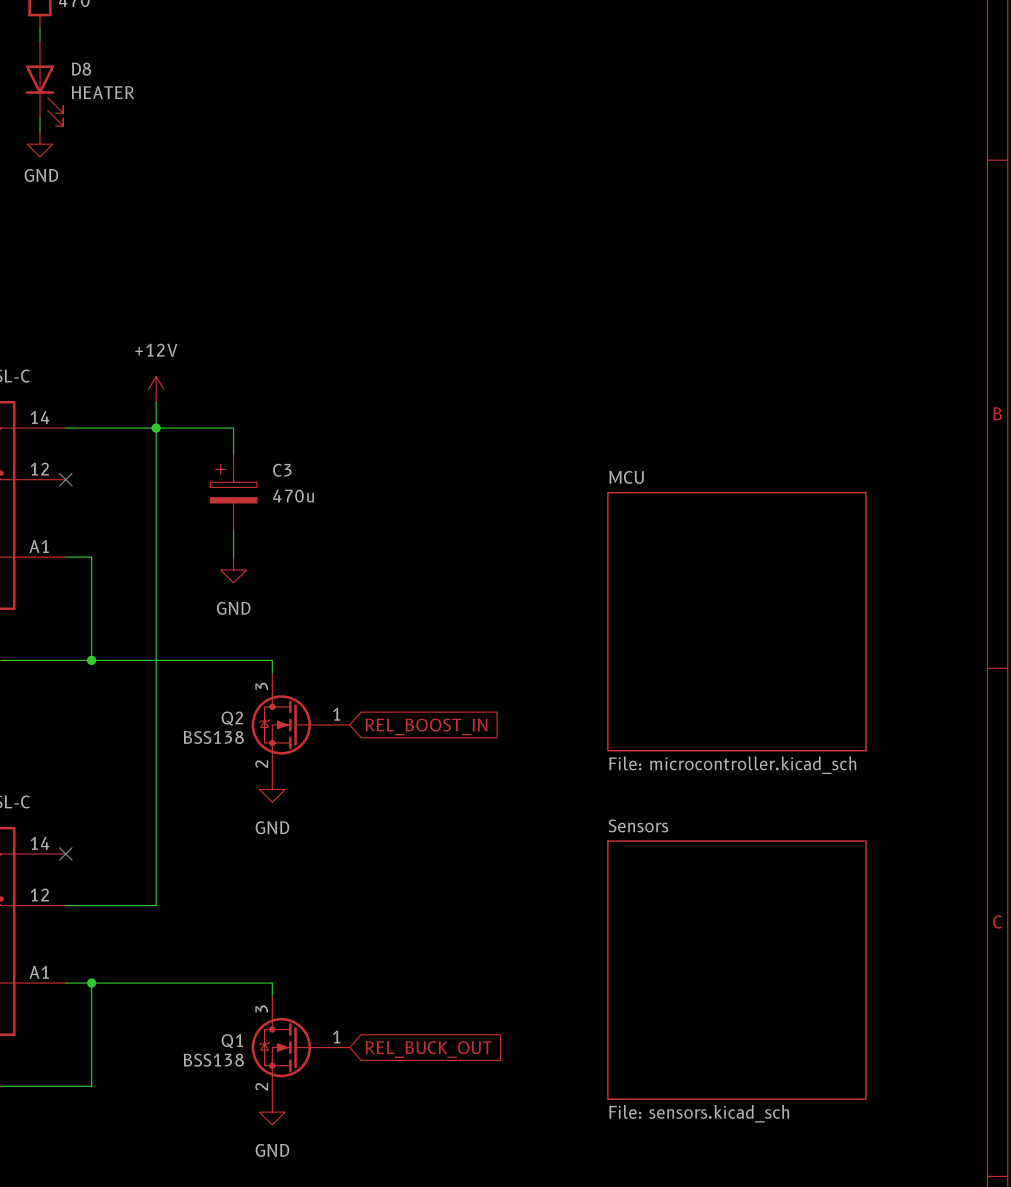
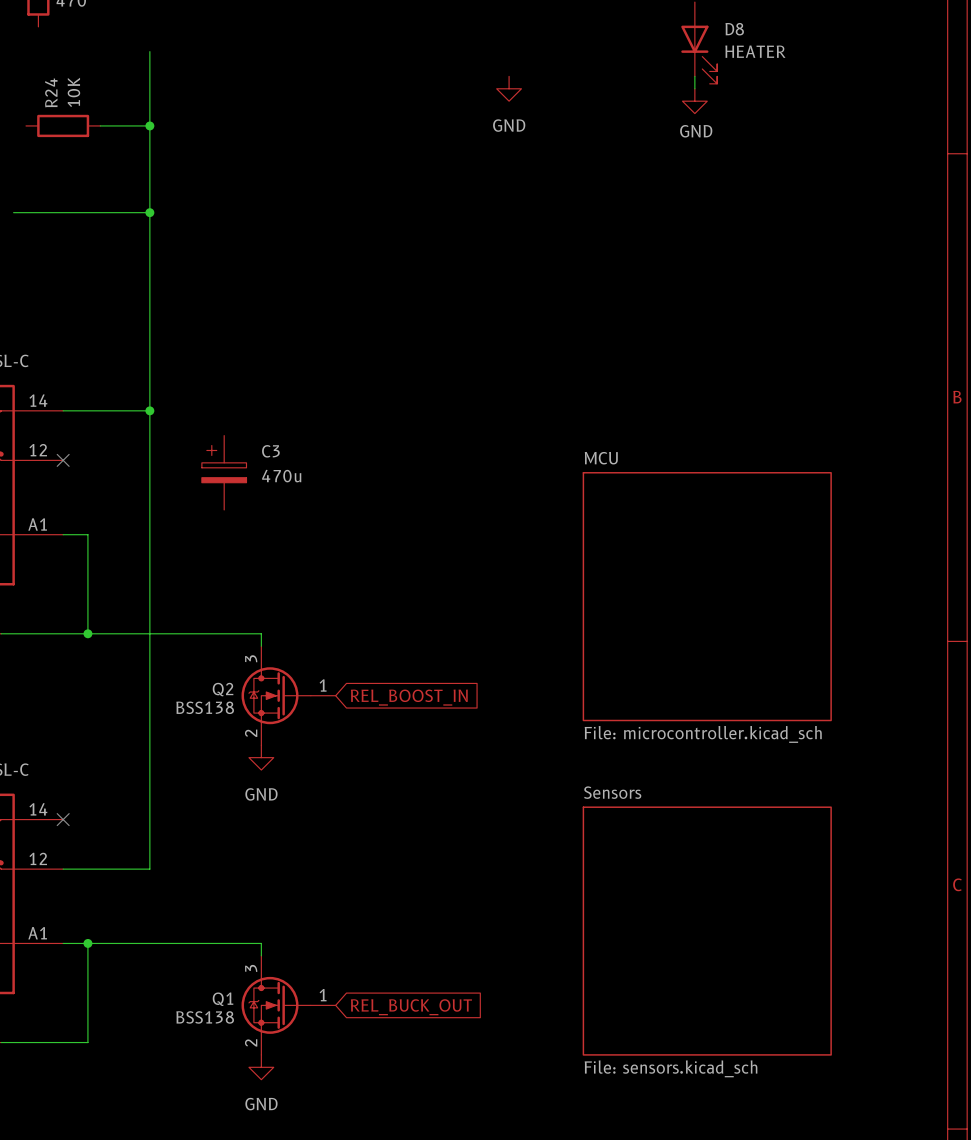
wire: (40, 27) (40, 40) -> none
wire: none -> (149, 51) (149, 386)
wire: none -> (694, 76) (694, 88)
D8 position: (44, 83) -> (699, 42)
power symbol: none -> GND (509, 88)
power symbol: none -> GND (694, 101)
R24: none -> 10K (63, 125)
wire: none -> (100, 125) (149, 125)
junction: none -> (149, 125)
power symbol: GND (40, 144) -> none
wire: none -> (13, 212) (149, 212)
junction: none -> (149, 212)
power symbol: +12V (156, 389) -> none
wire: (156, 428) (233, 428) (233, 453) -> none
wire: (233, 531) (233, 557) -> none
power symbol: GND (233, 570) -> none

